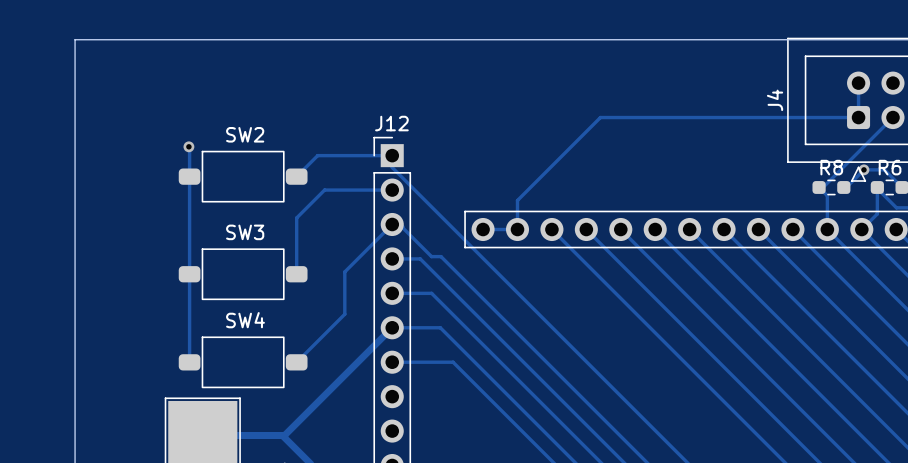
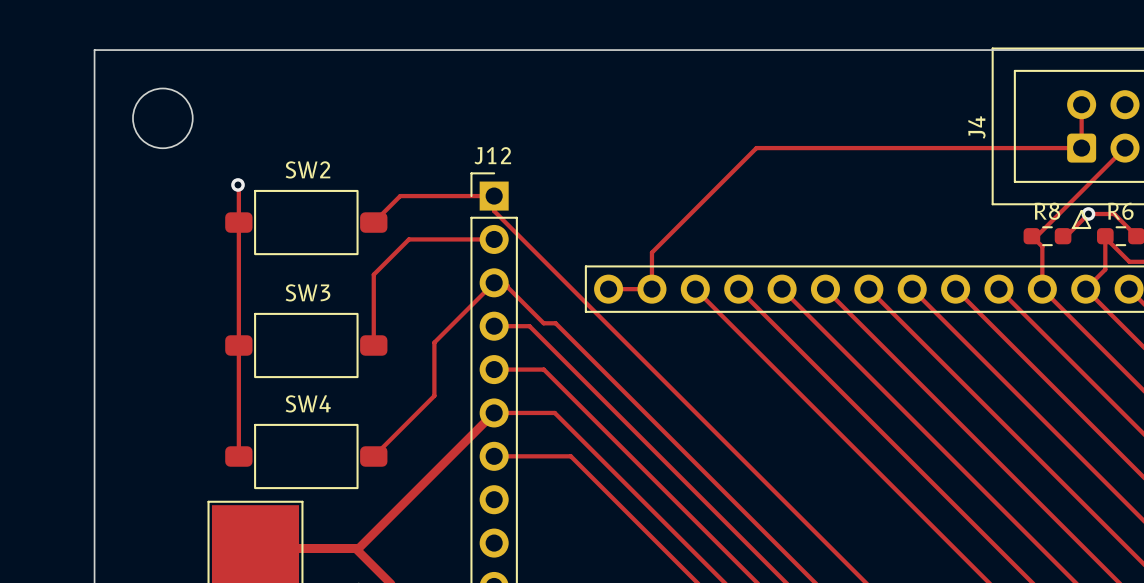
round board edge: none -> [132, 87, 194, 150]

